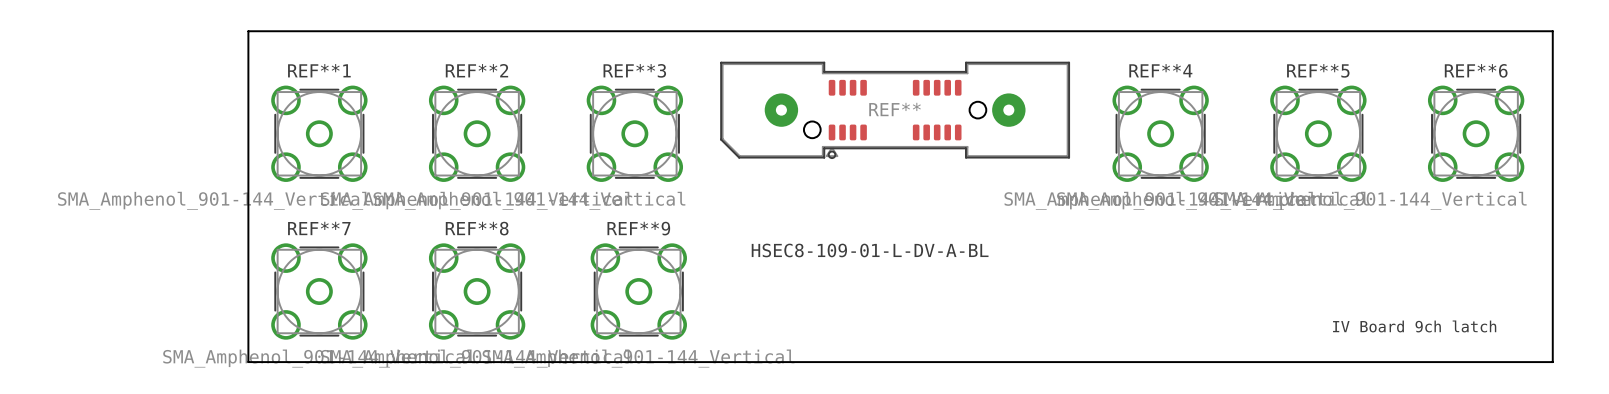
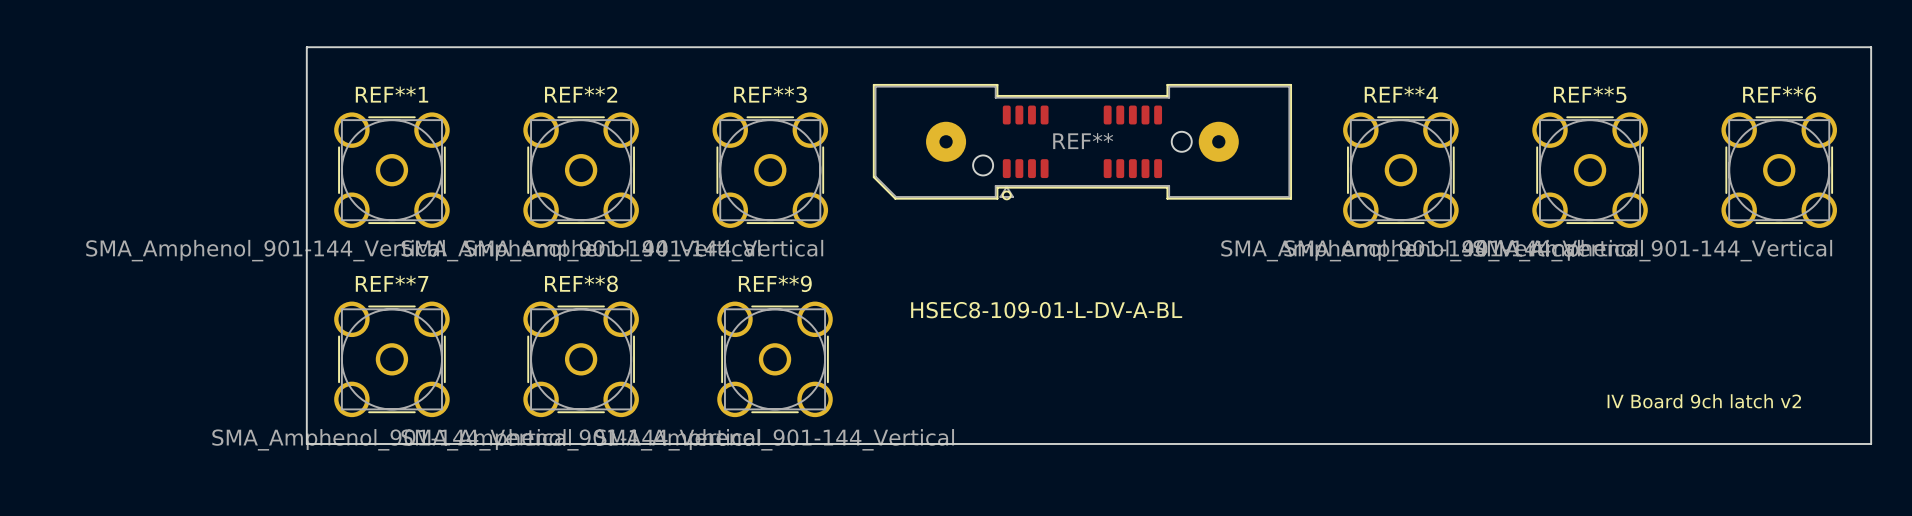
text: IV Board 9ch latch (1414, 326) -> IV Board 9ch latch v2 (1704, 401)

